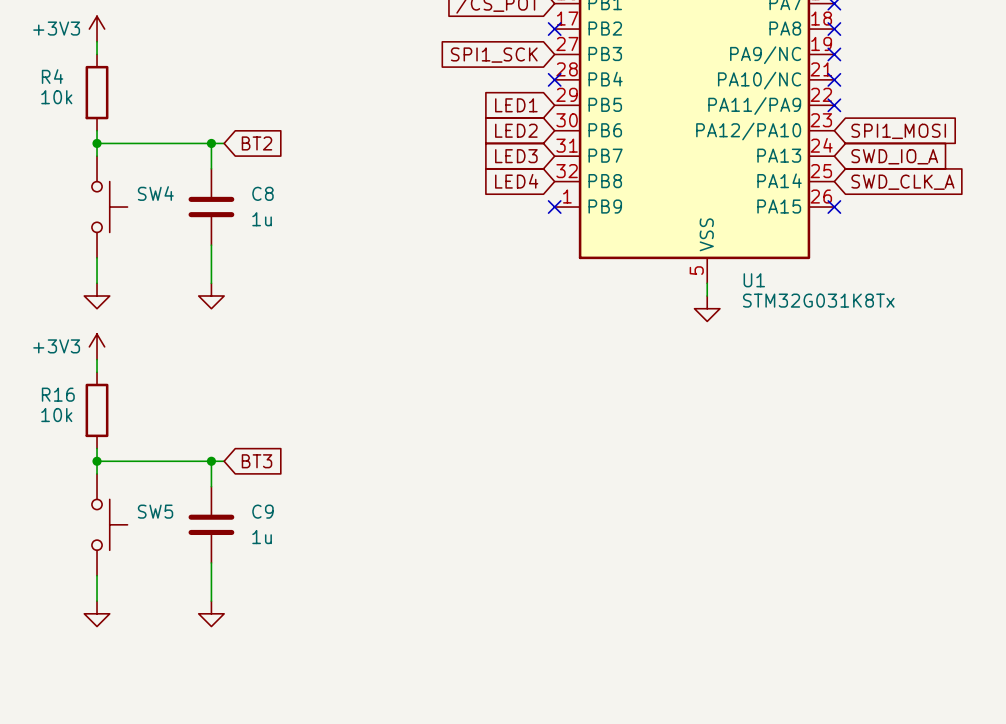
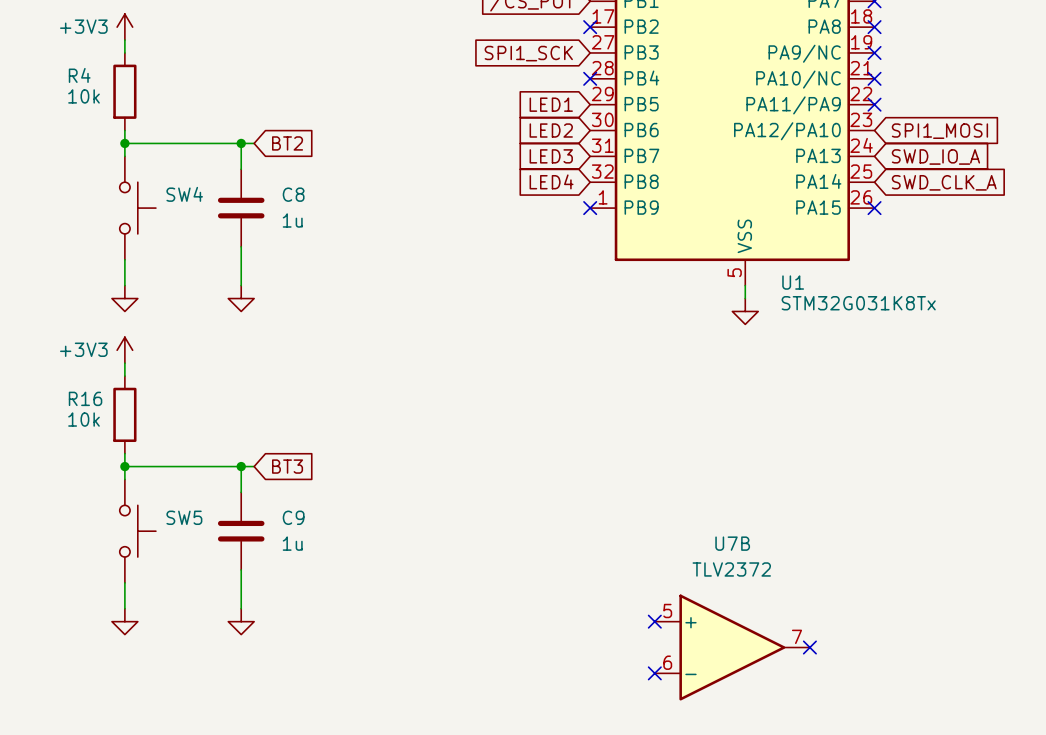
no-connect mark: none -> (654, 621)
U7B: none -> TLV2372 (732, 647)
no-connect mark: none -> (809, 647)
no-connect mark: none -> (654, 673)

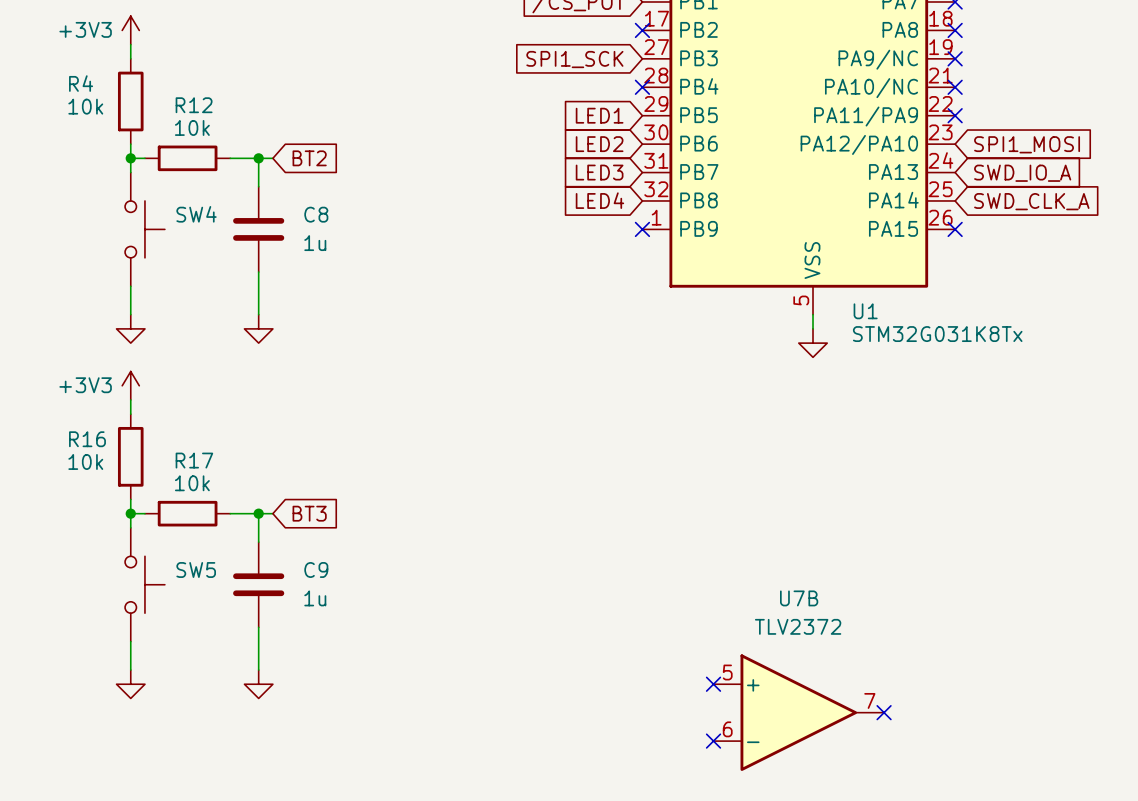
wire: (137, 143) (215, 143) -> none
R12: none -> 10k (187, 158)
wire: (137, 466) (215, 466) -> none
R17: none -> 10k (187, 513)

